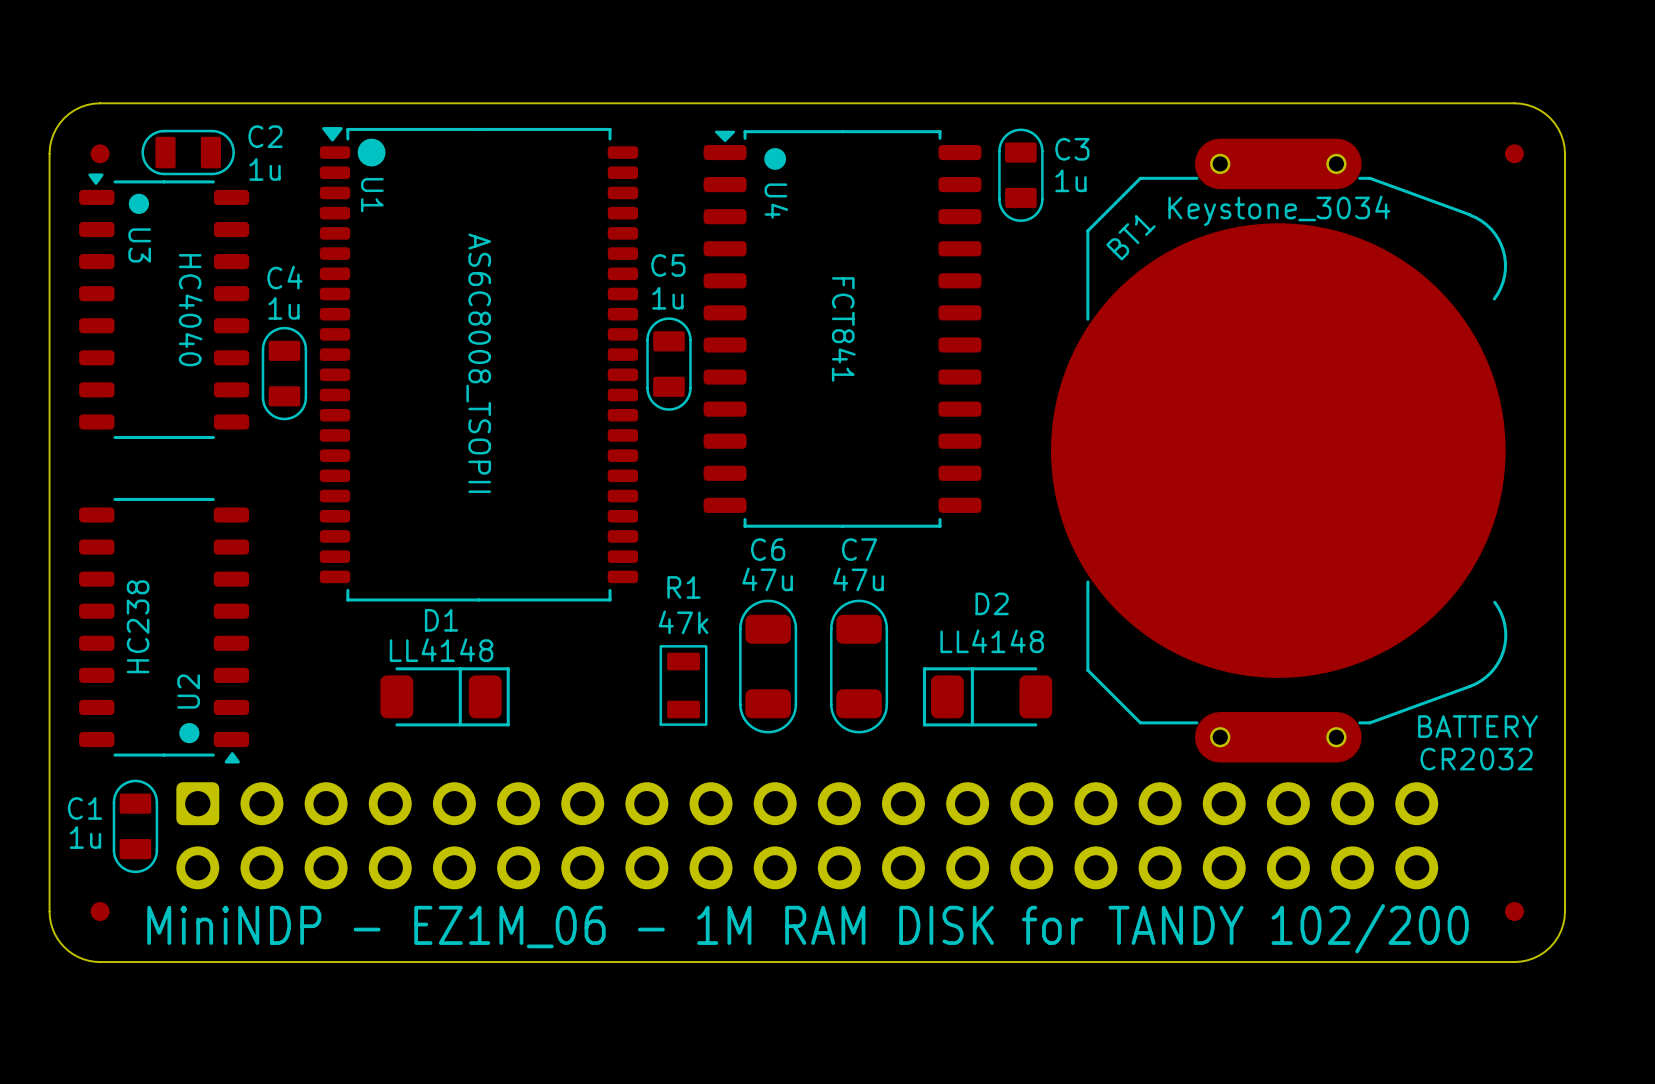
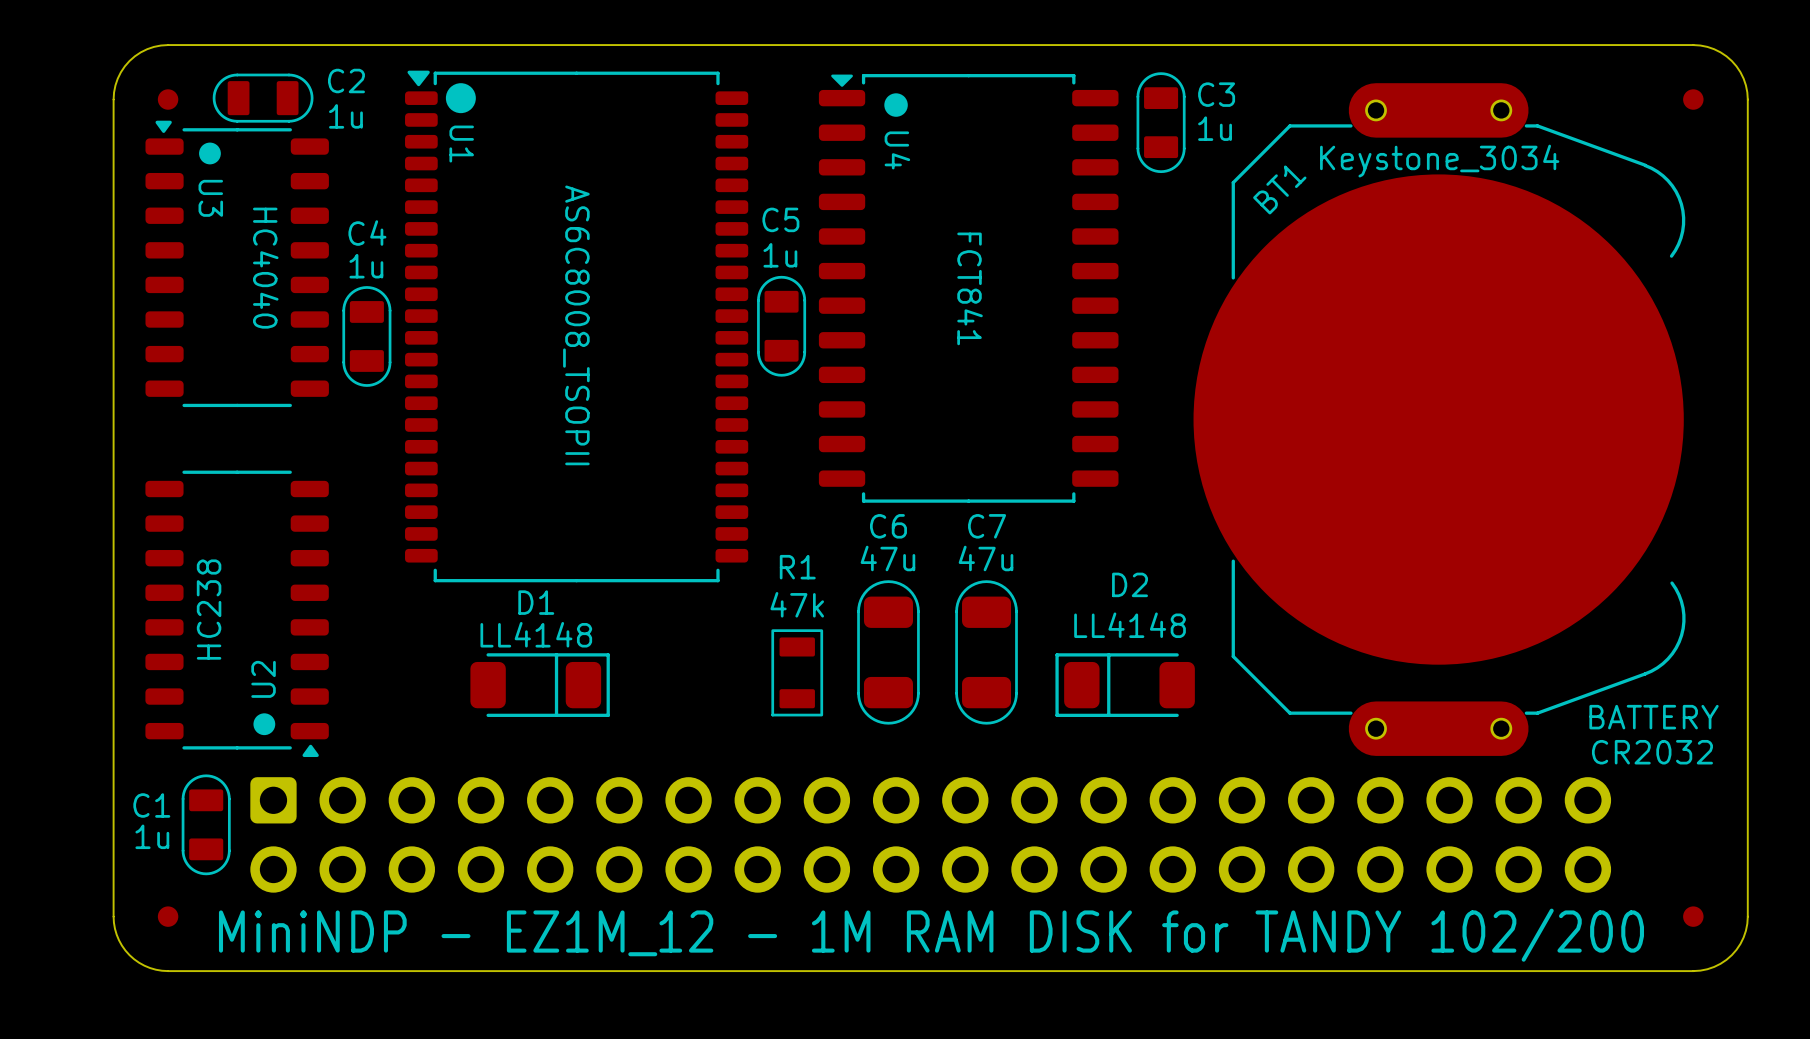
text: MiniNDP - EZ1M_06 - 1M RAM DISK for TANDY 102/200 (808, 928) -> MiniNDP - EZ1M_12 - 1M RAM DISK for TANDY 102/200 (931, 935)

